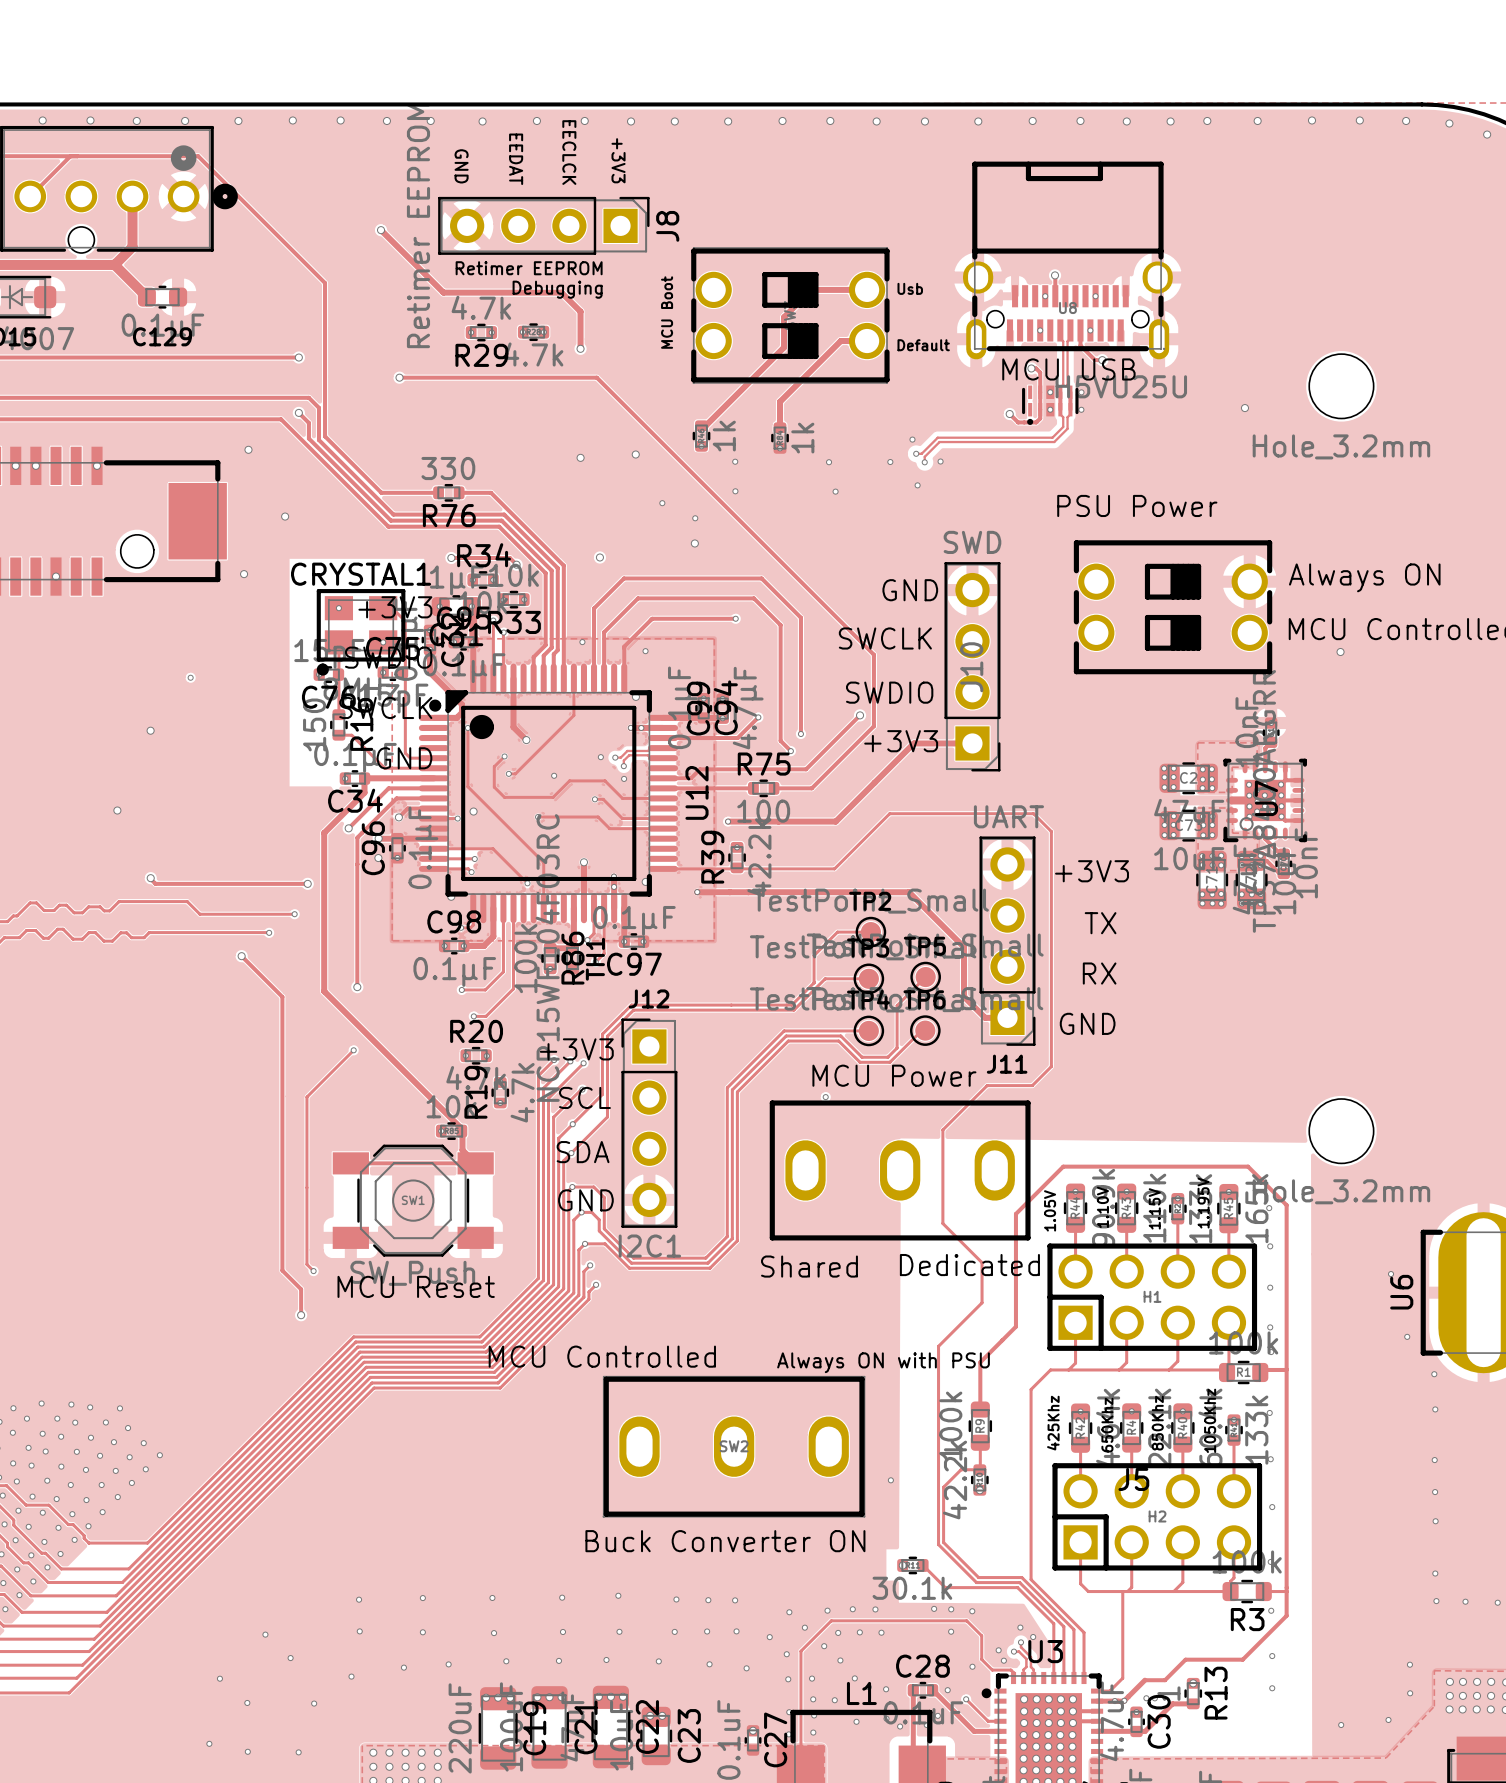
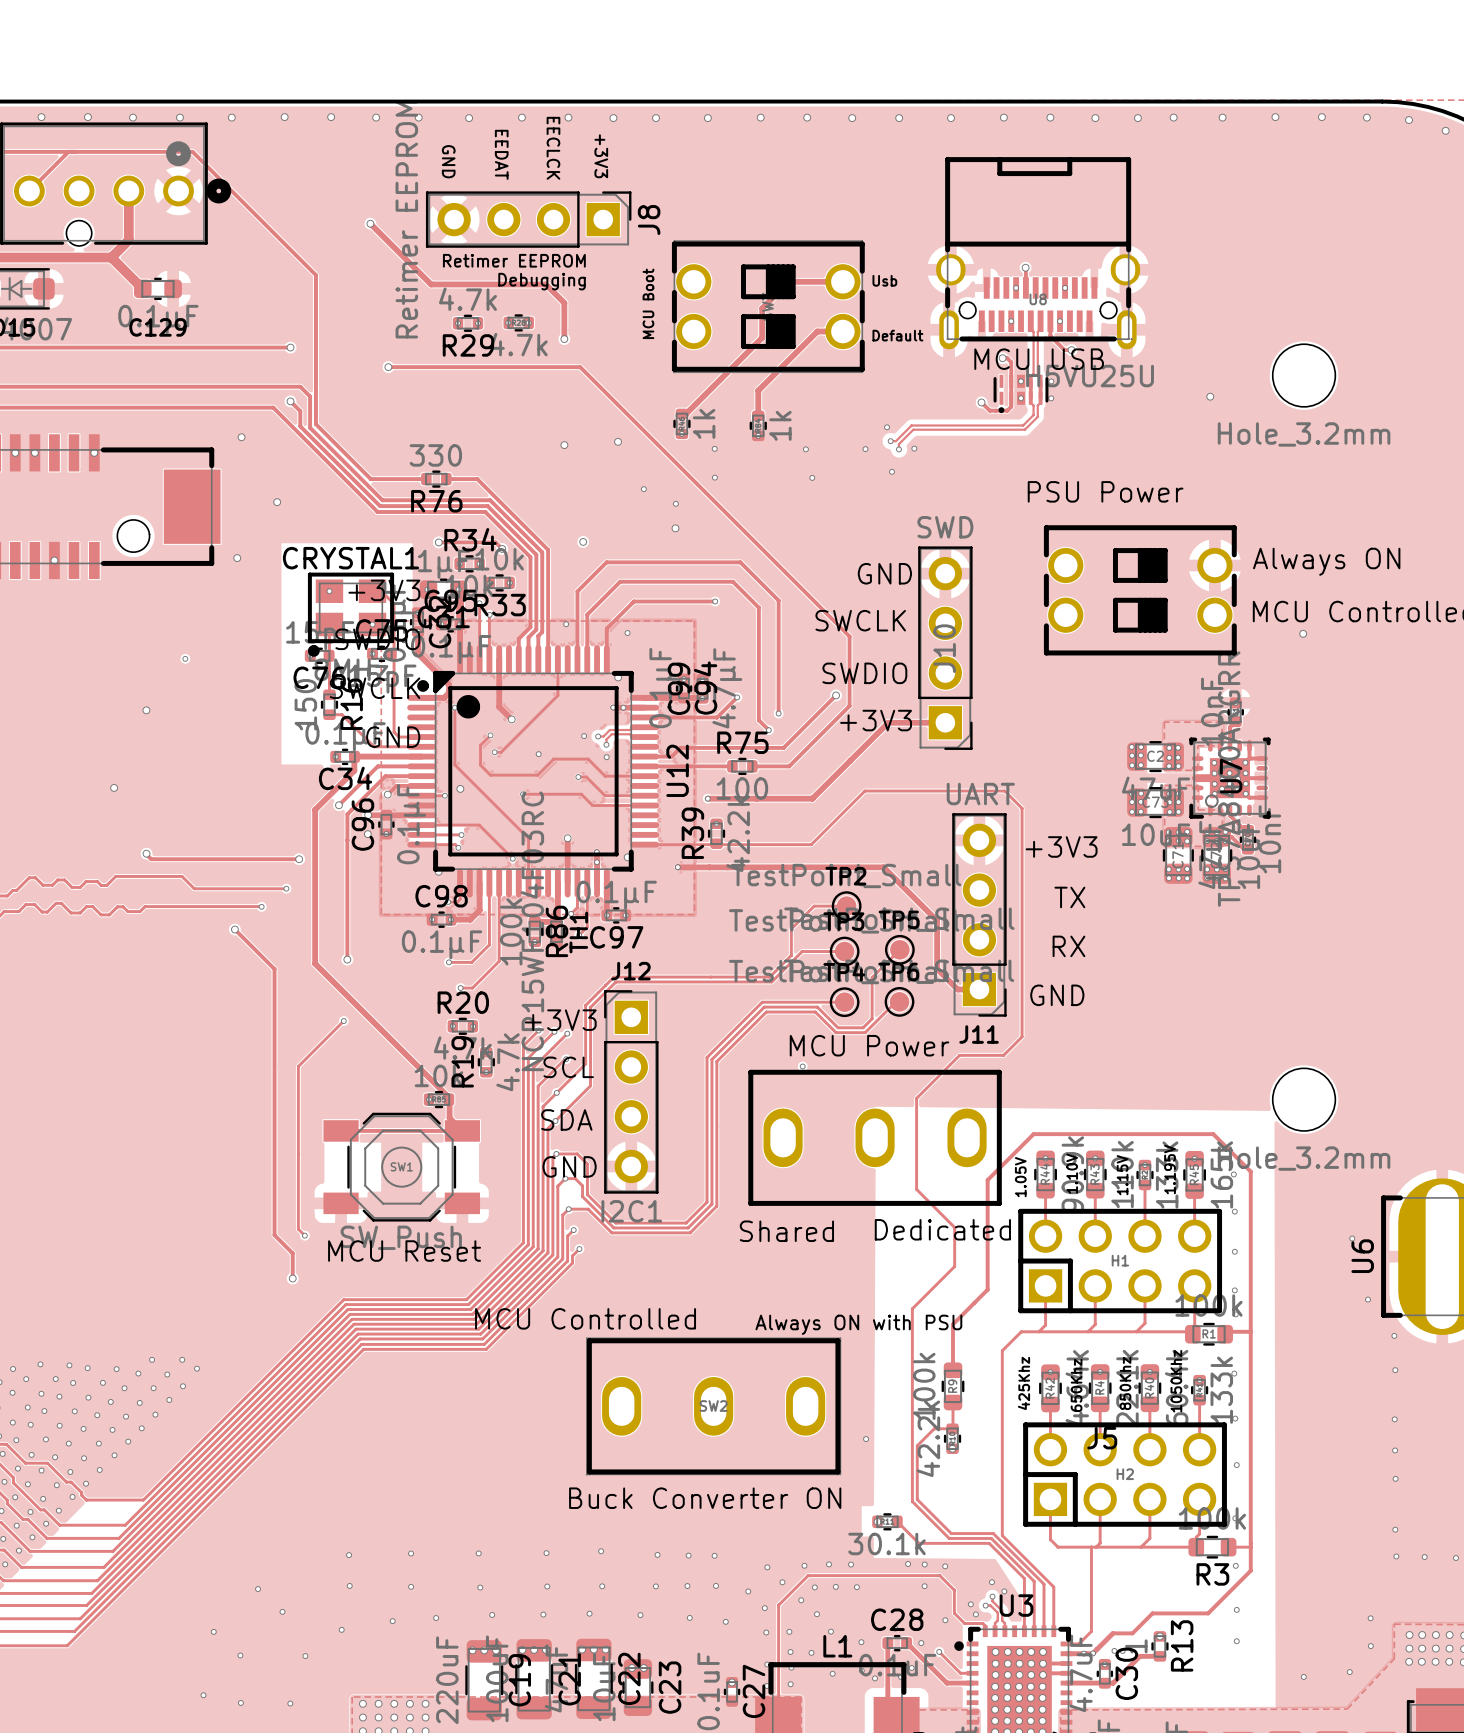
via: none -> (152, 1359)
via: none -> (182, 1359)
via: none -> (196, 1368)
via: none -> (138, 1373)
via: none -> (167, 1374)
via: none -> (183, 1386)
via: none -> (153, 1388)
via: none -> (169, 1399)

